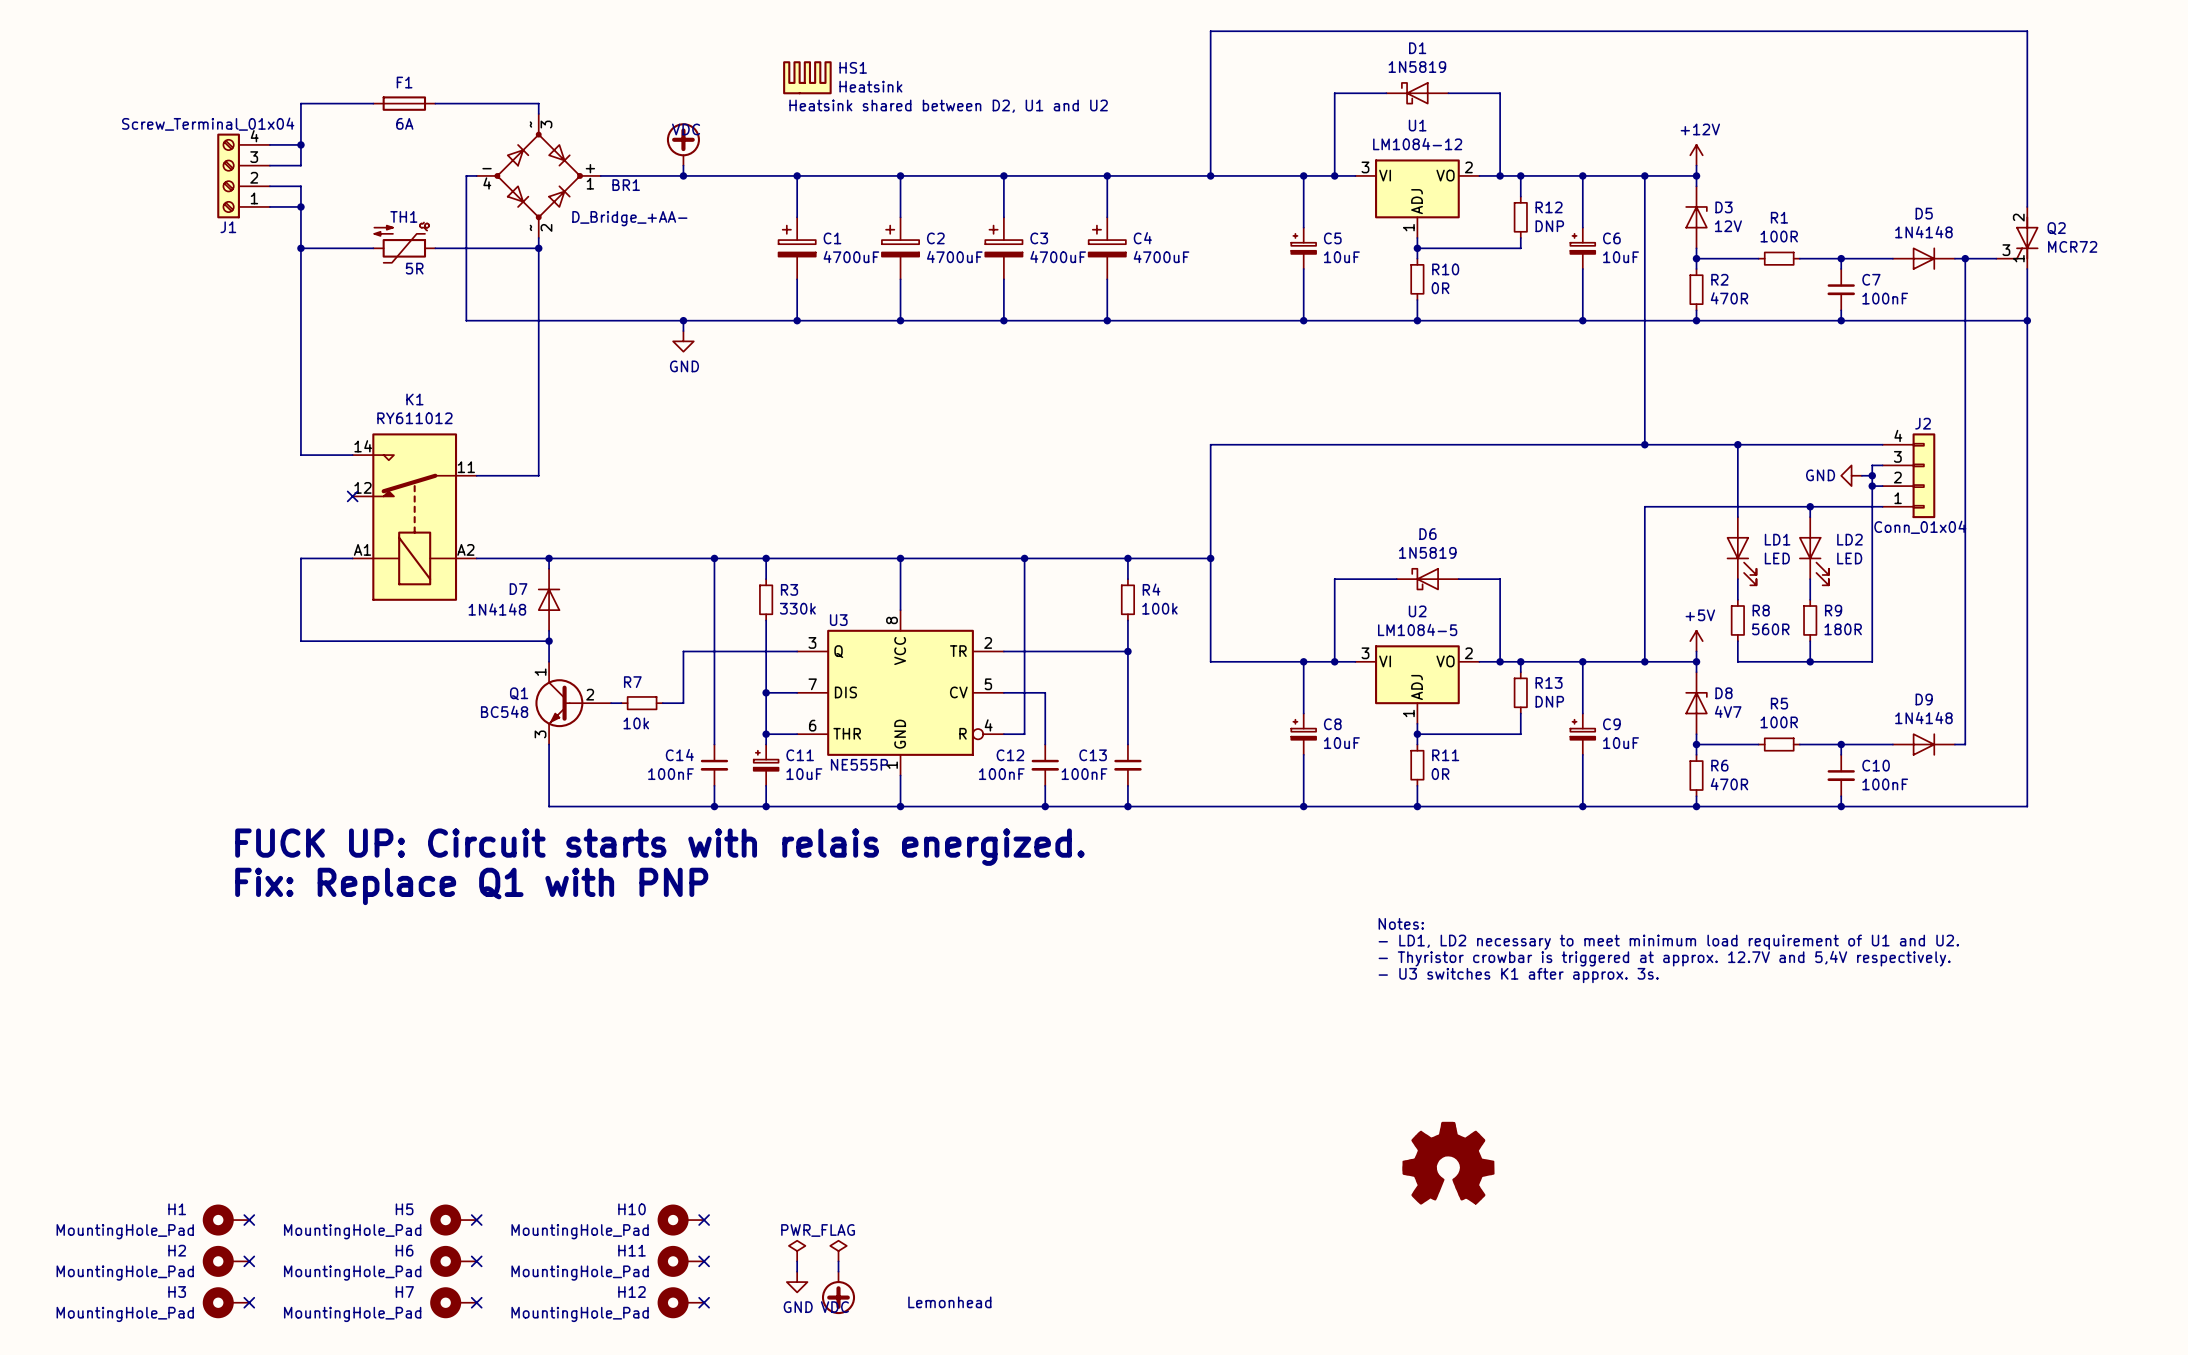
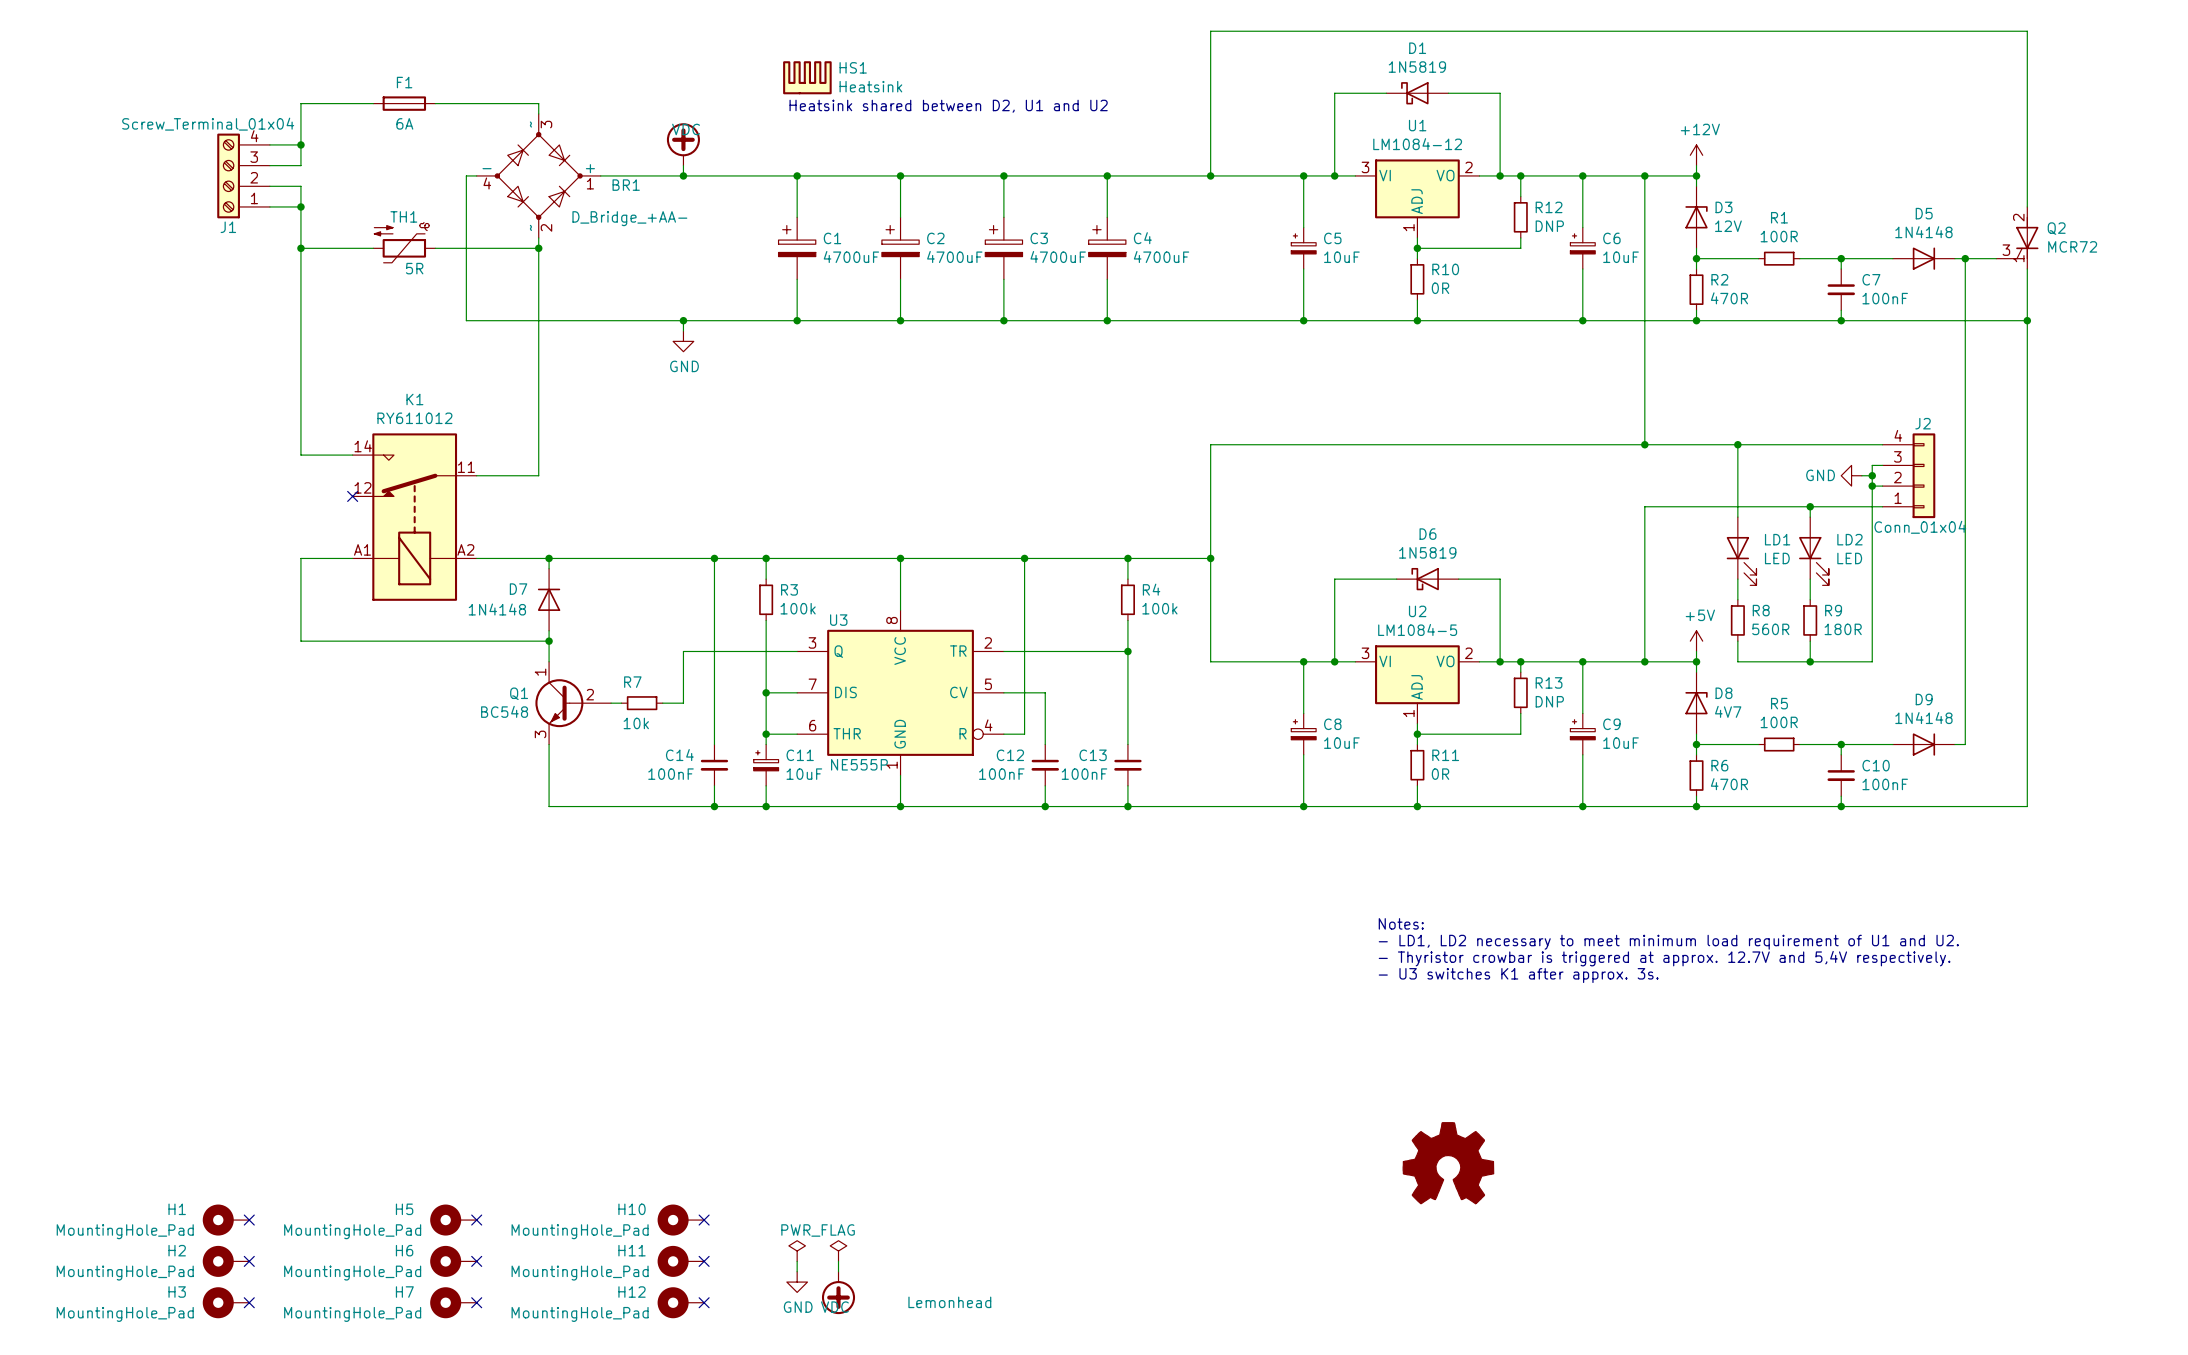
R3 value: 330k (797, 608) -> 100k (798, 608)
text: FUCK UP: Circuit starts with relais energized. (659, 847) -> none
text: Fix: Replace Q1 with PNP (471, 886) -> none

